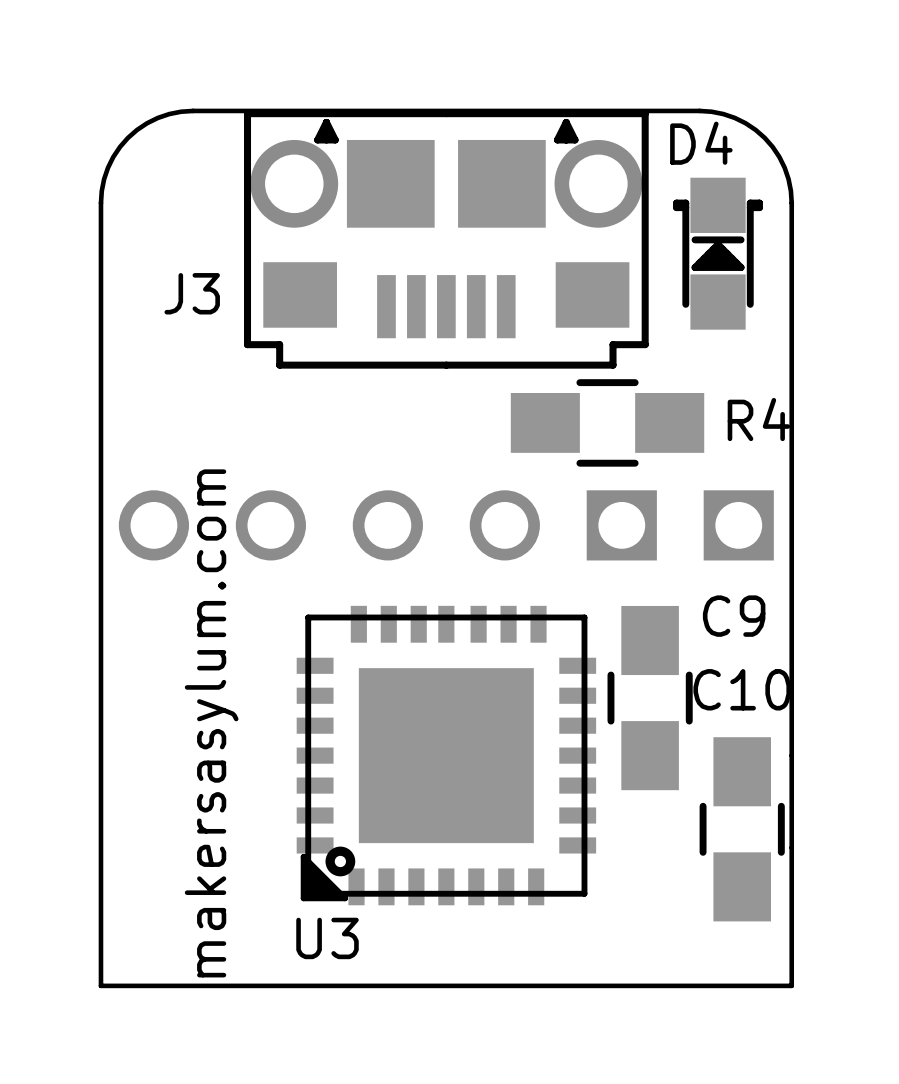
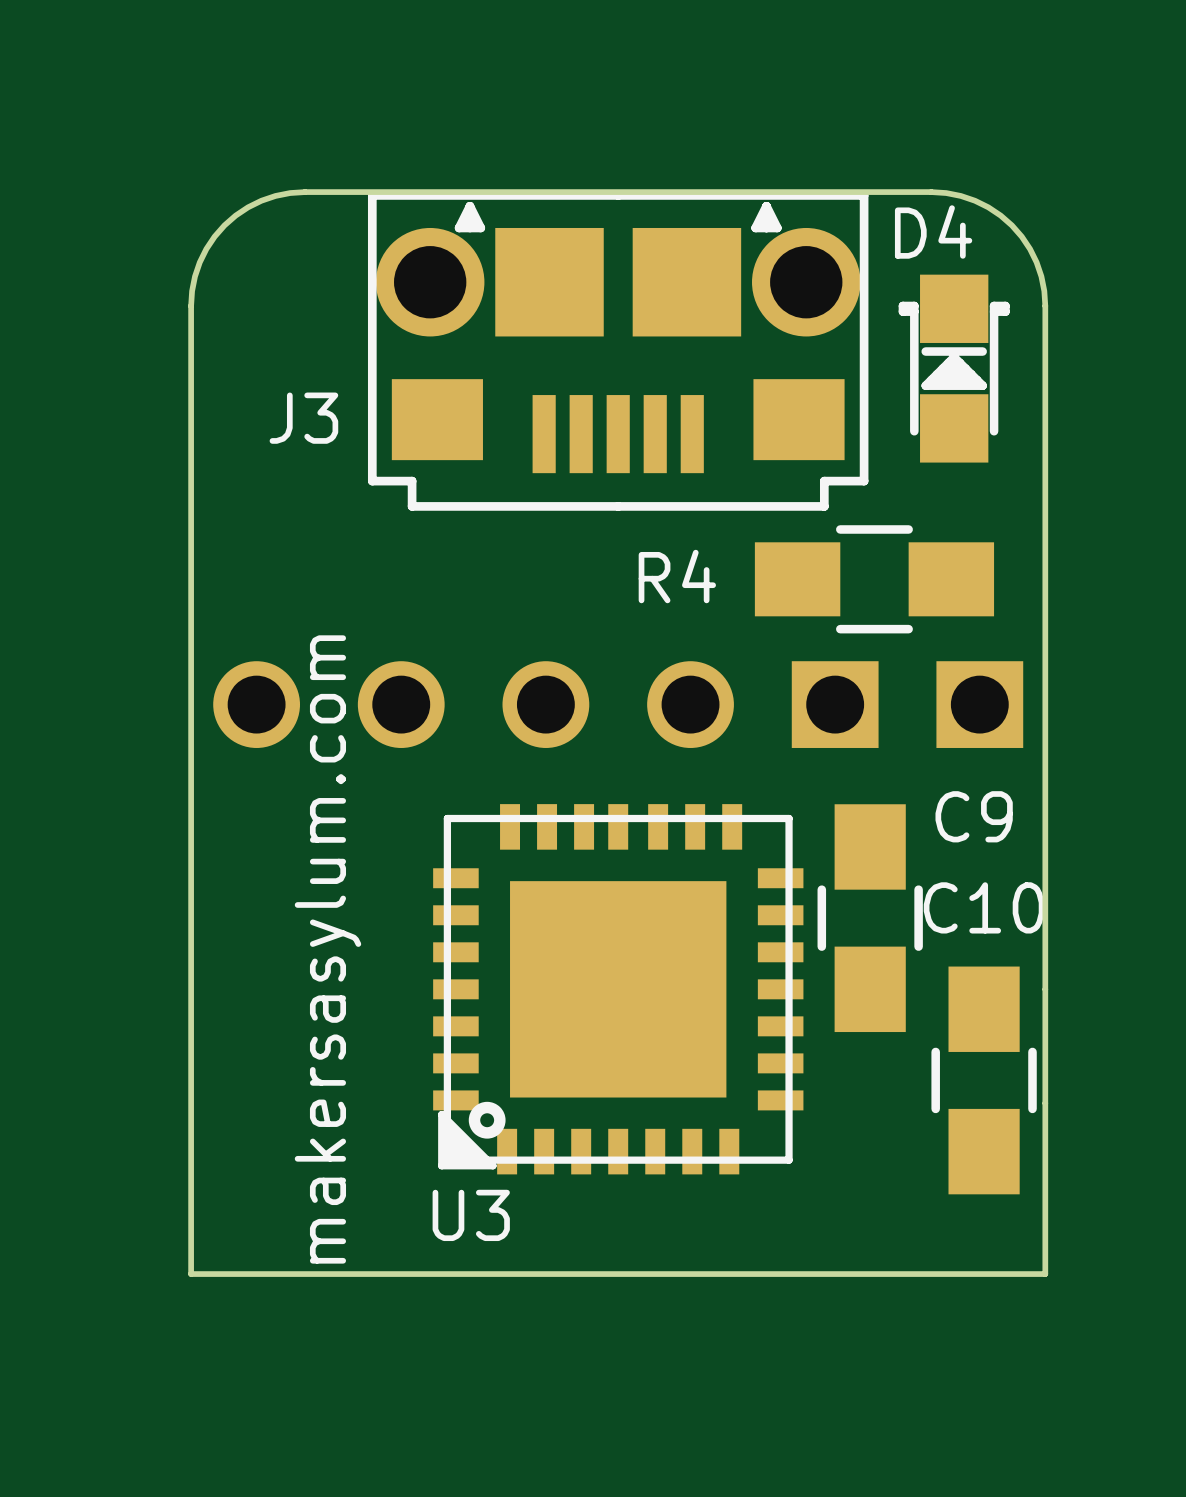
R4 name position: R4 (758, 419) -> R4 (677, 576)
R4 position: (607, 422) -> (874, 579)

